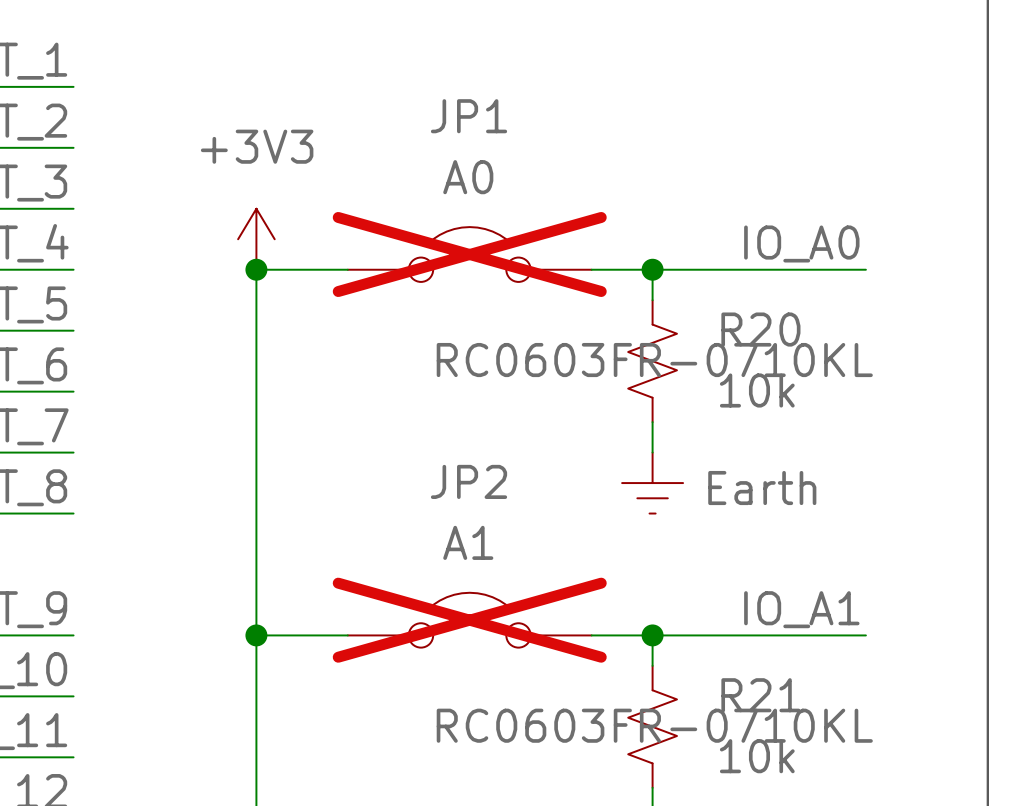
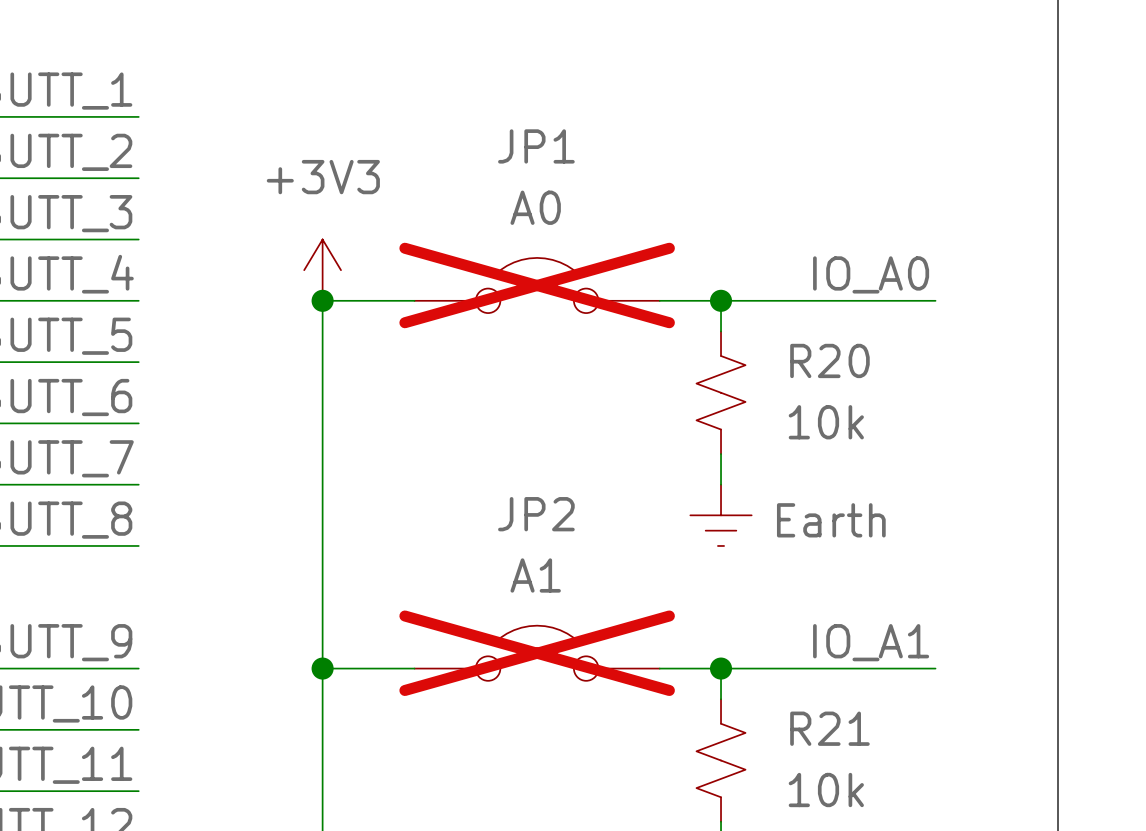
R20 text: RC0603FR-0710KL (654, 360) -> none
R21 text: RC0603FR-0710KL (654, 725) -> none

